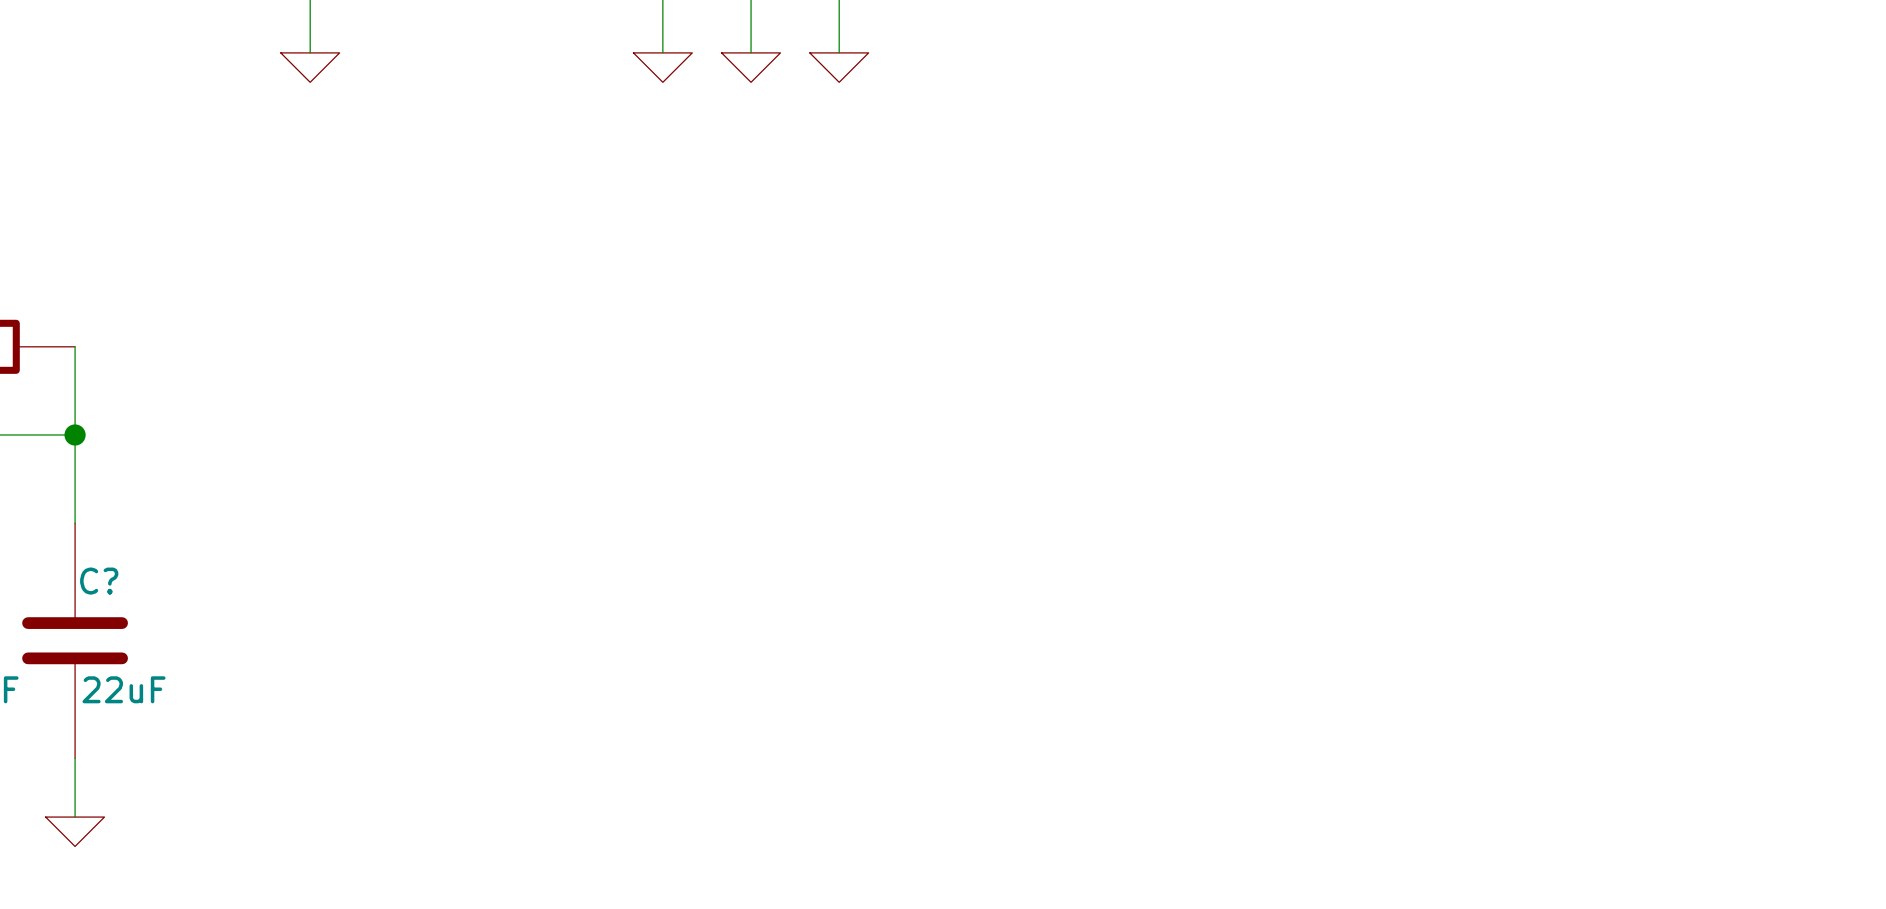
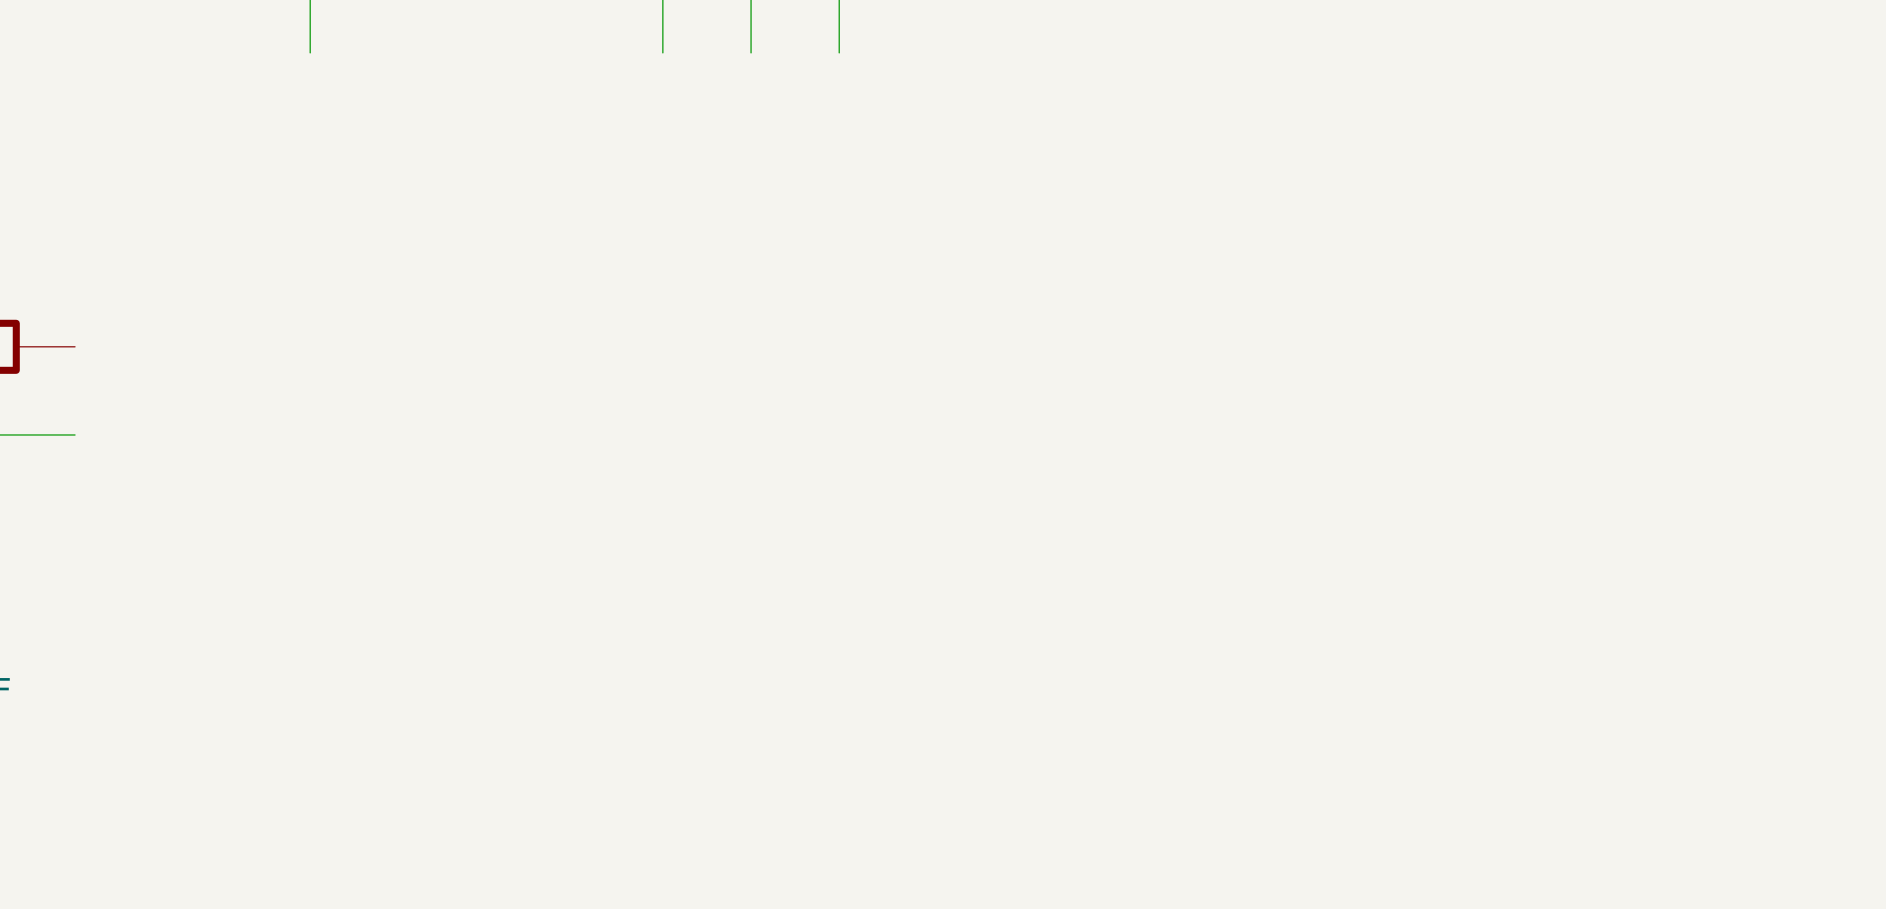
power symbol: (310, 67) -> none
power symbol: (662, 67) -> none
power symbol: (751, 67) -> none
power symbol: (839, 67) -> none
wire: (75, 346) (75, 523) -> none
junction: (75, 434) -> none
C?: 22uF (75, 640) -> none
wire: (75, 758) (75, 817) -> none
power symbol: (75, 831) -> none

